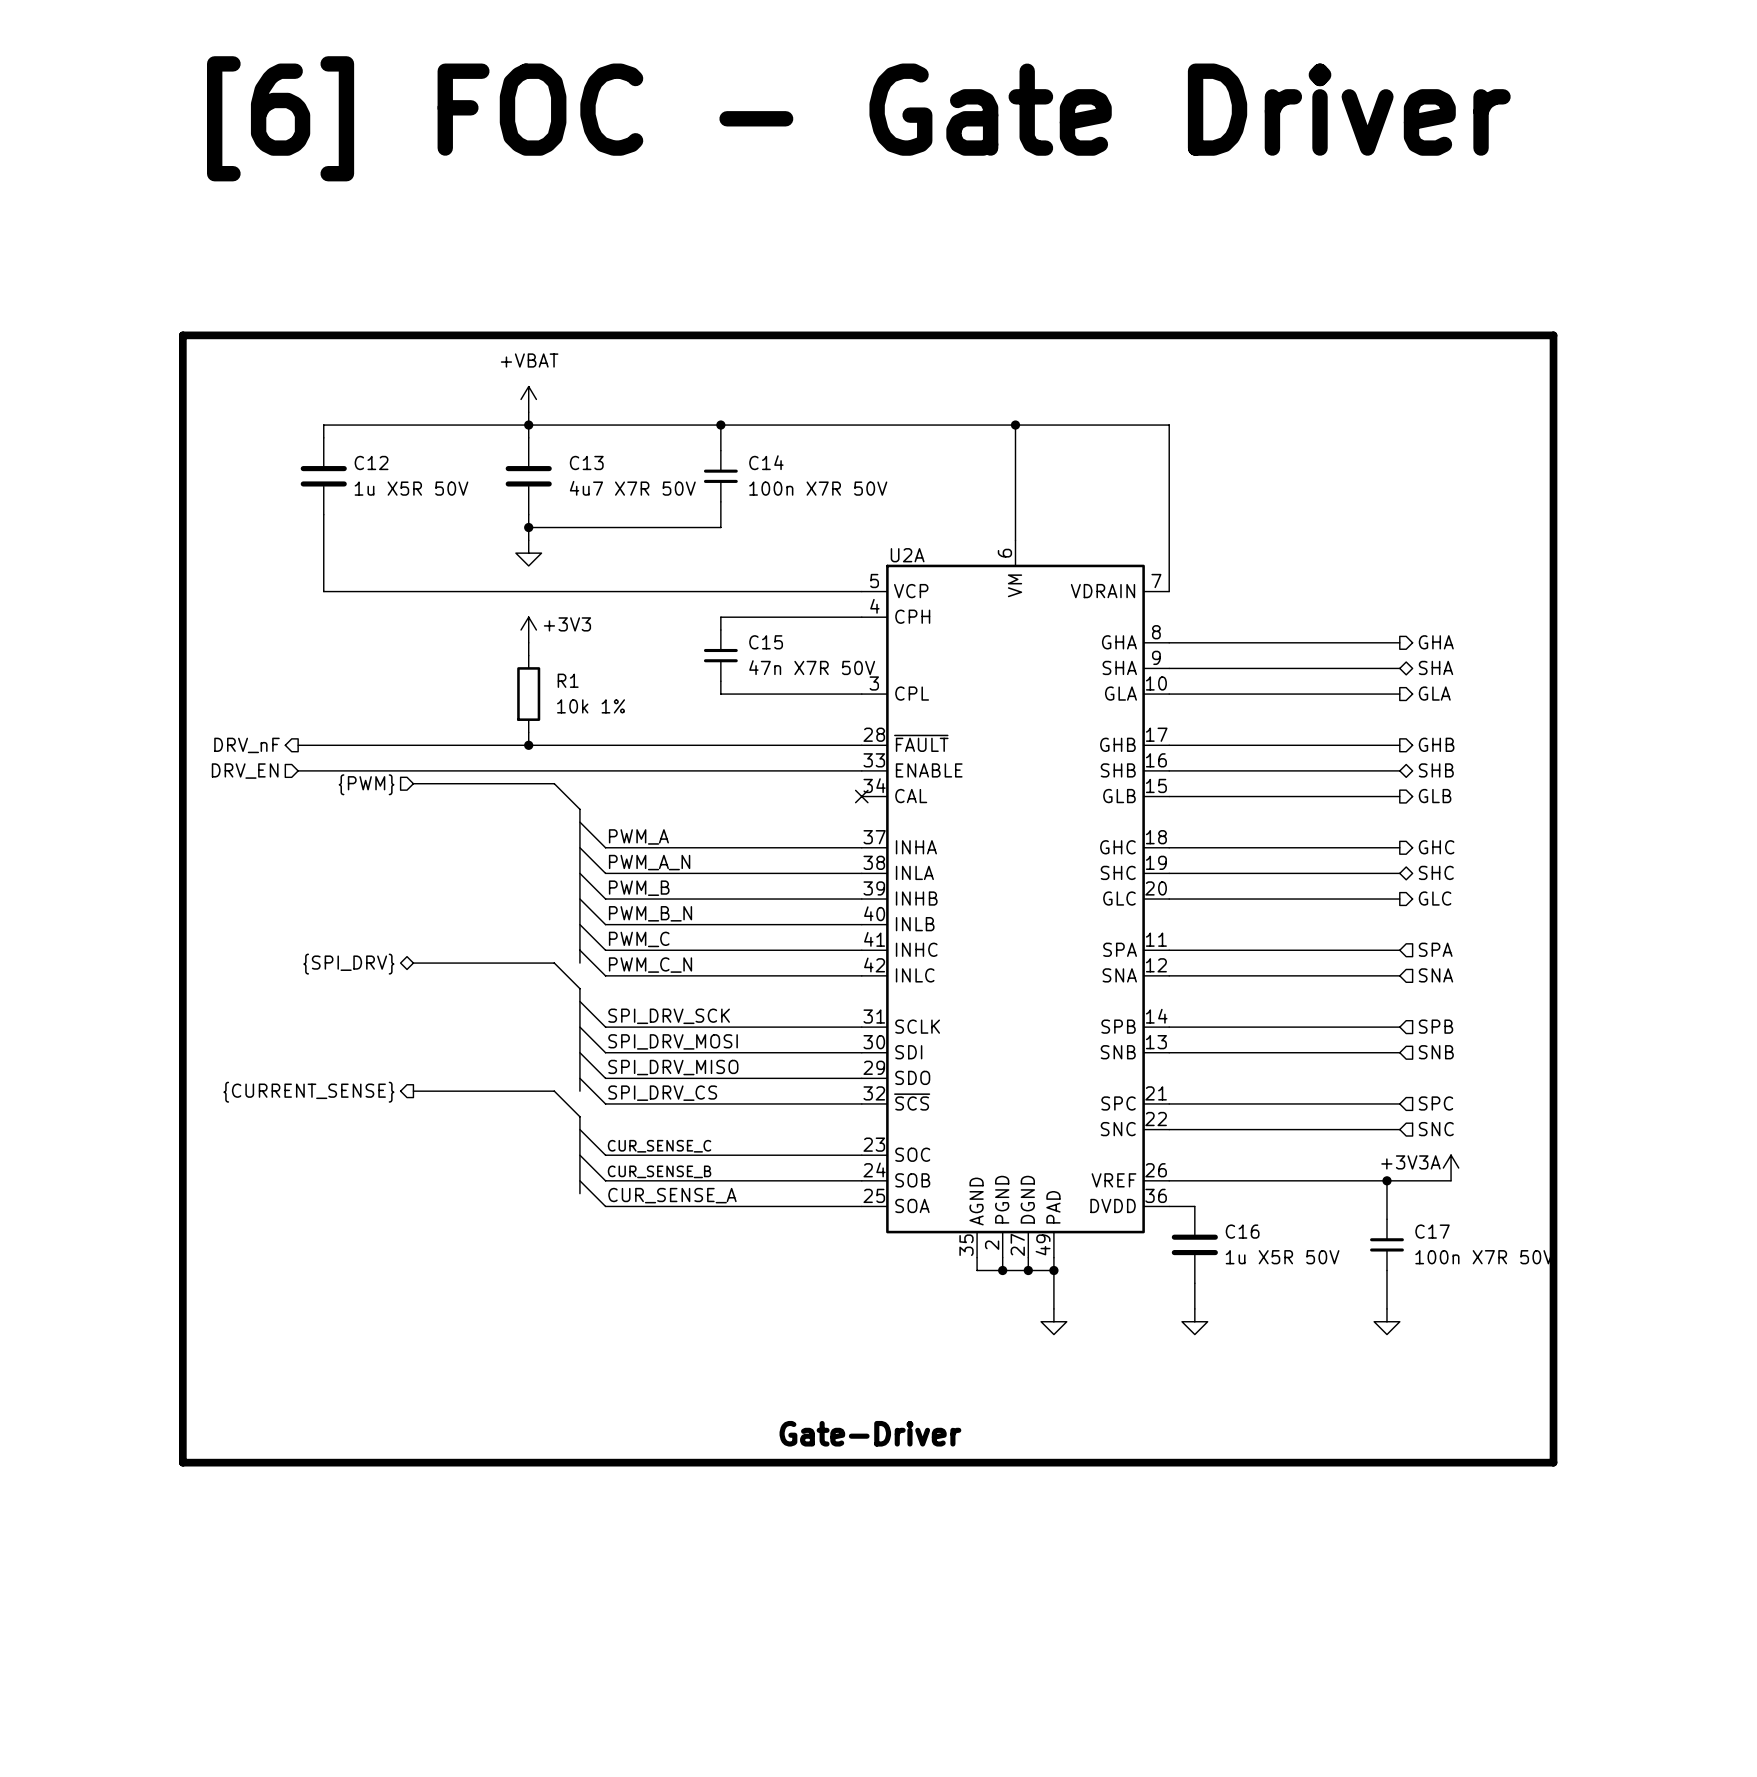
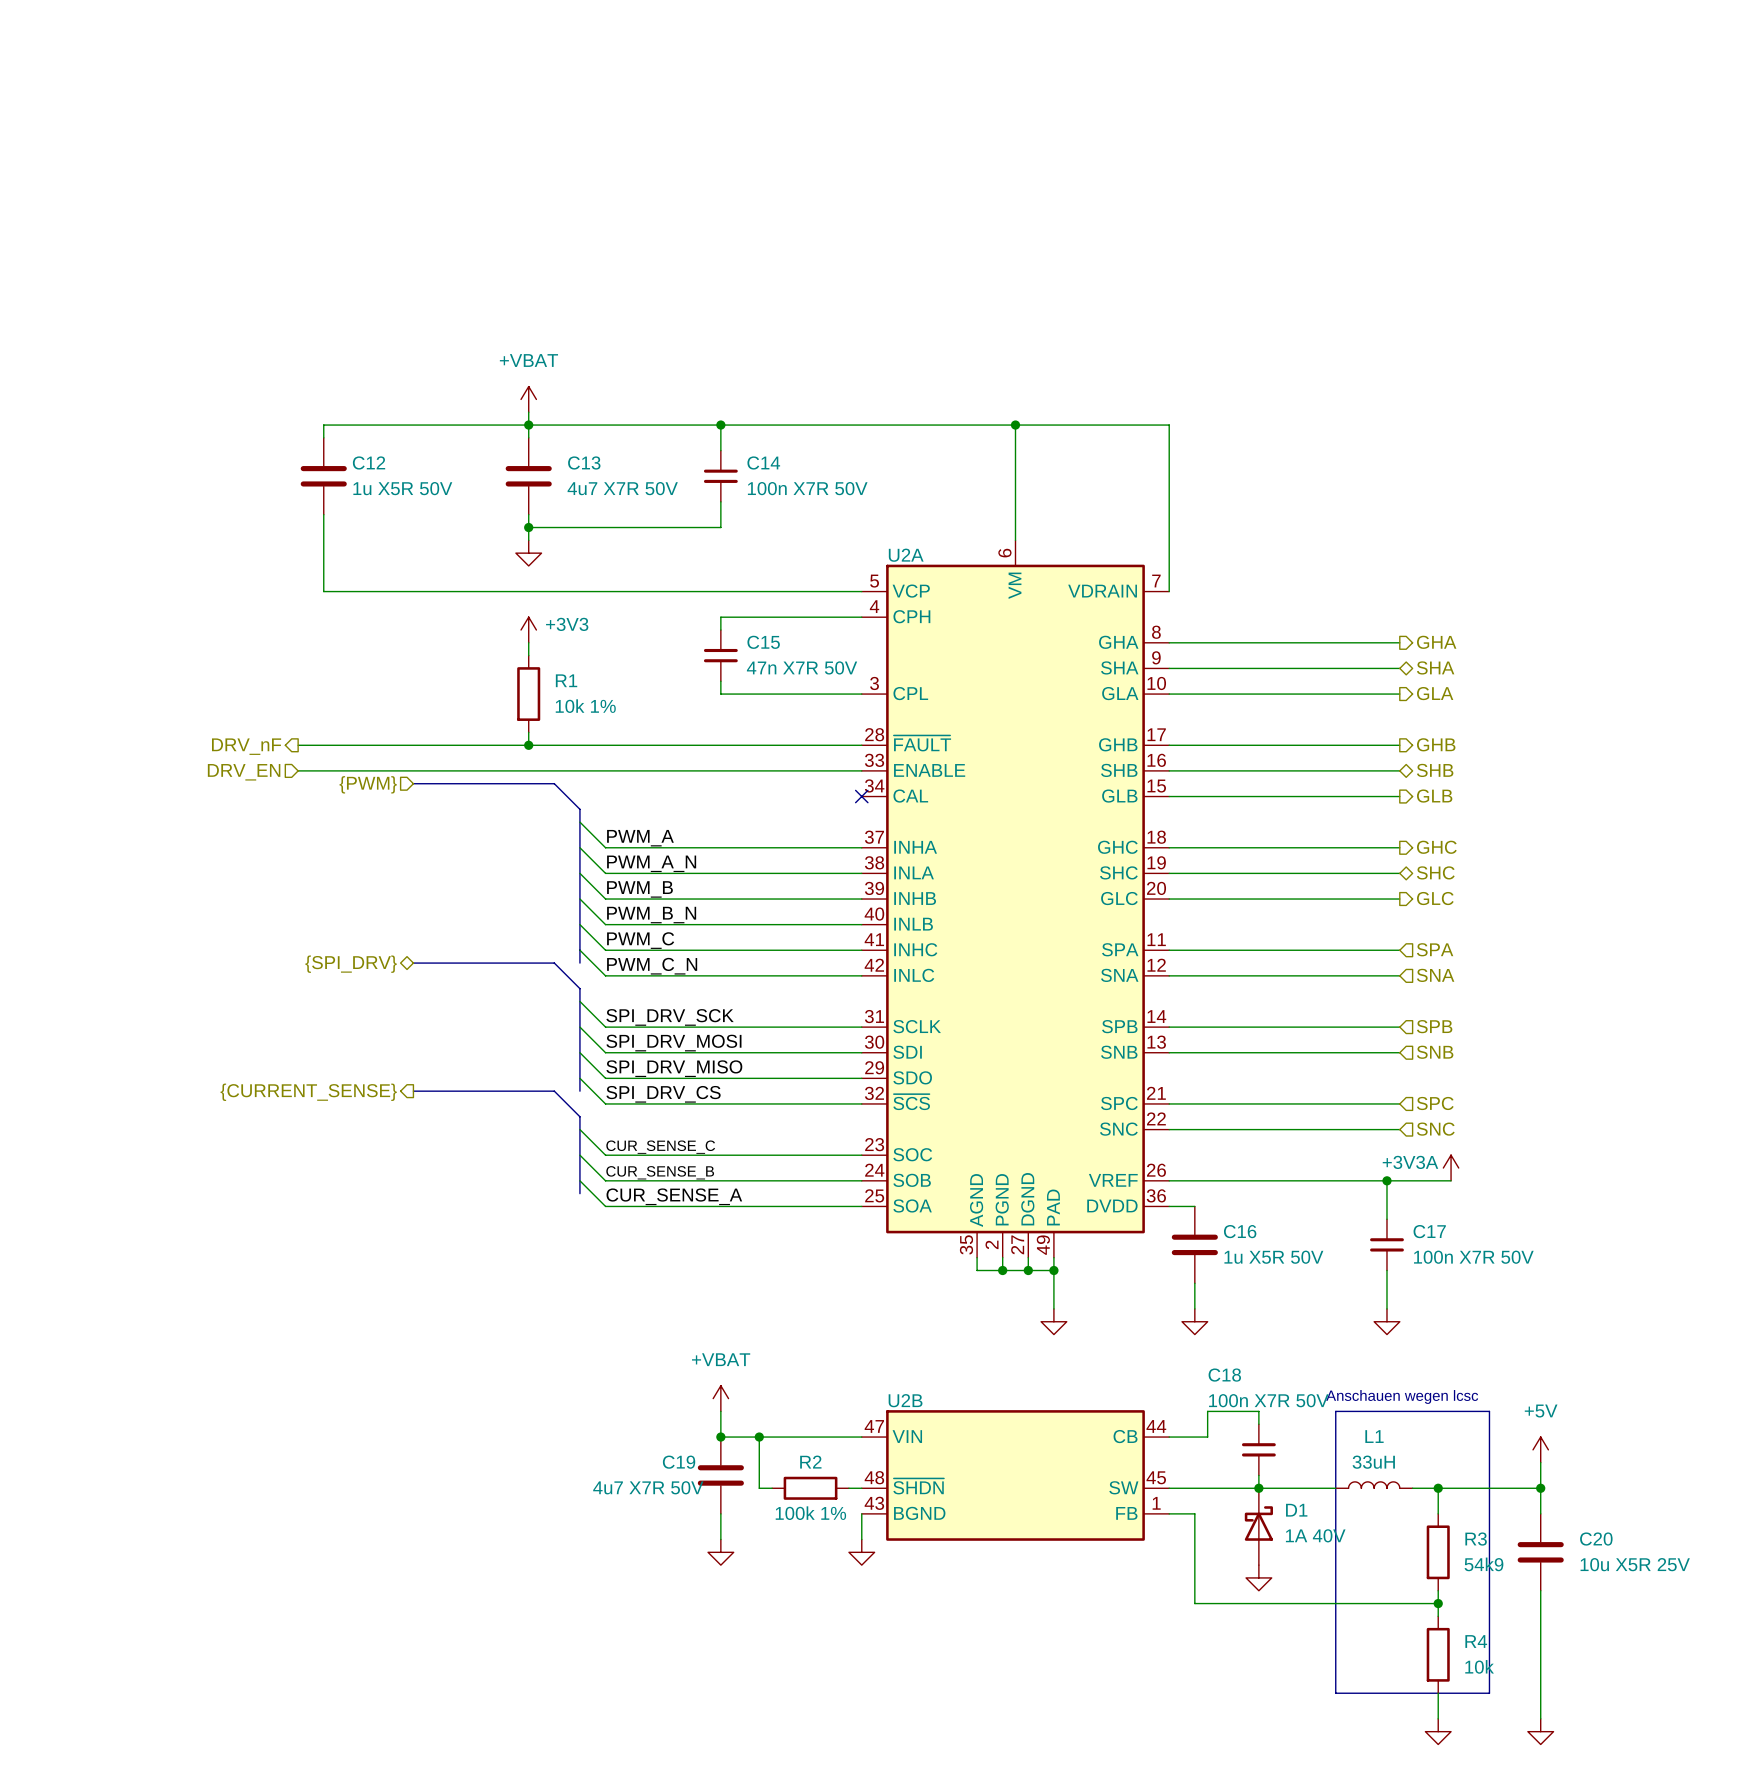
text: [6] FOC - Gate Driver (858, 118) -> none
line: (182, 335) (1553, 335) (1553, 1462) (182, 1462) (182, 335) -> none
text: none -> Anschauen wegen lcsc (1402, 1396)
power symbol: none -> +VBAT (720, 1398)
wire: none -> (720, 1411) (720, 1437) (861, 1437)
line: none -> (1335, 1411) (1489, 1411) (1489, 1693) (1335, 1693) (1335, 1411)
wire: none -> (1258, 1424) (1258, 1411) (1207, 1411) (1207, 1437) (1169, 1437)
text: Gate-Driver (870, 1433) -> none
junction: none -> (720, 1437)
wire: none -> (759, 1437) (759, 1488) (772, 1488)
junction: none -> (759, 1437)
C18: none -> 100n X7R 50V (1258, 1449)
power symbol: none -> +5V (1540, 1449)
wire: none -> (1540, 1462) (1540, 1513)
C19: none -> 4u7 X7R 50V (720, 1475)
U2B: none -> (1015, 1475)
wire: none -> (1258, 1475) (1258, 1488)
L1: none -> 33uH (1374, 1485)
R2: none -> 100k 1% (810, 1488)
wire: none -> (848, 1488) (861, 1488)
wire: none -> (1169, 1488) (1335, 1488)
junction: none -> (1258, 1488)
wire: none -> (1412, 1488) (1540, 1488)
wire: none -> (1438, 1488) (1438, 1513)
junction: none -> (1438, 1488)
junction: none -> (1540, 1488)
wire: none -> (720, 1513) (720, 1539)
wire: none -> (861, 1513) (861, 1539)
wire: none -> (1169, 1513) (1194, 1513) (1194, 1603) (1438, 1603)
D1: none -> 1A 40V (1258, 1526)
power symbol: none -> (720, 1552)
power symbol: none -> (861, 1552)
R3: none -> 54k9 (1438, 1552)
C20: none -> 10u X5R 25V (1540, 1552)
power symbol: none -> (1258, 1577)
wire: none -> (1438, 1590) (1438, 1616)
wire: none -> (1540, 1590) (1540, 1718)
junction: none -> (1438, 1603)
R4: none -> 10k (1438, 1654)
wire: none -> (1438, 1693) (1438, 1718)
power symbol: none -> (1438, 1731)
power symbol: none -> (1540, 1731)

